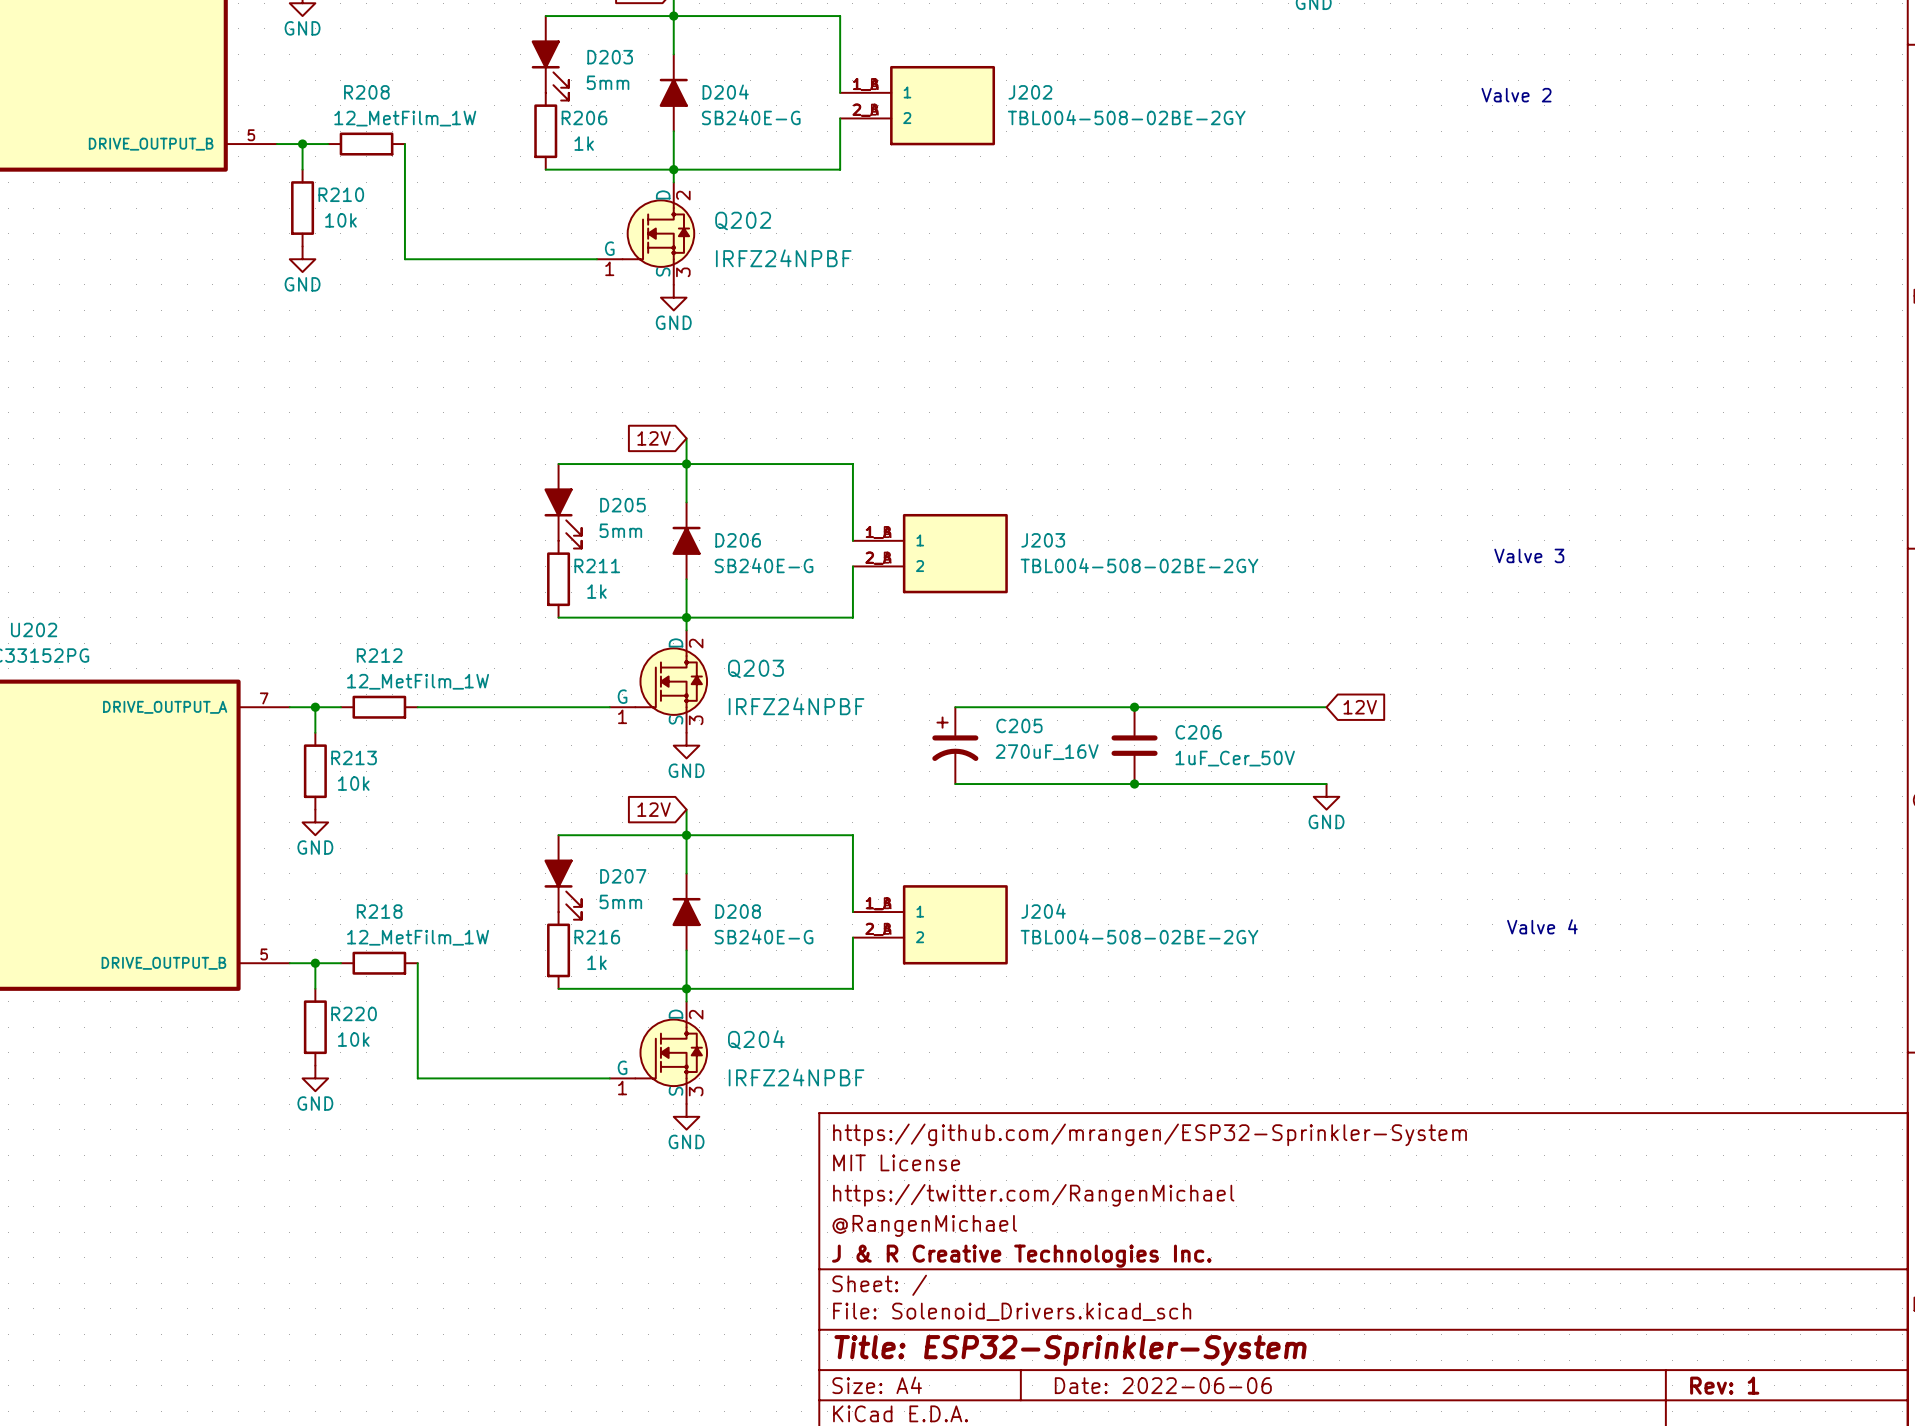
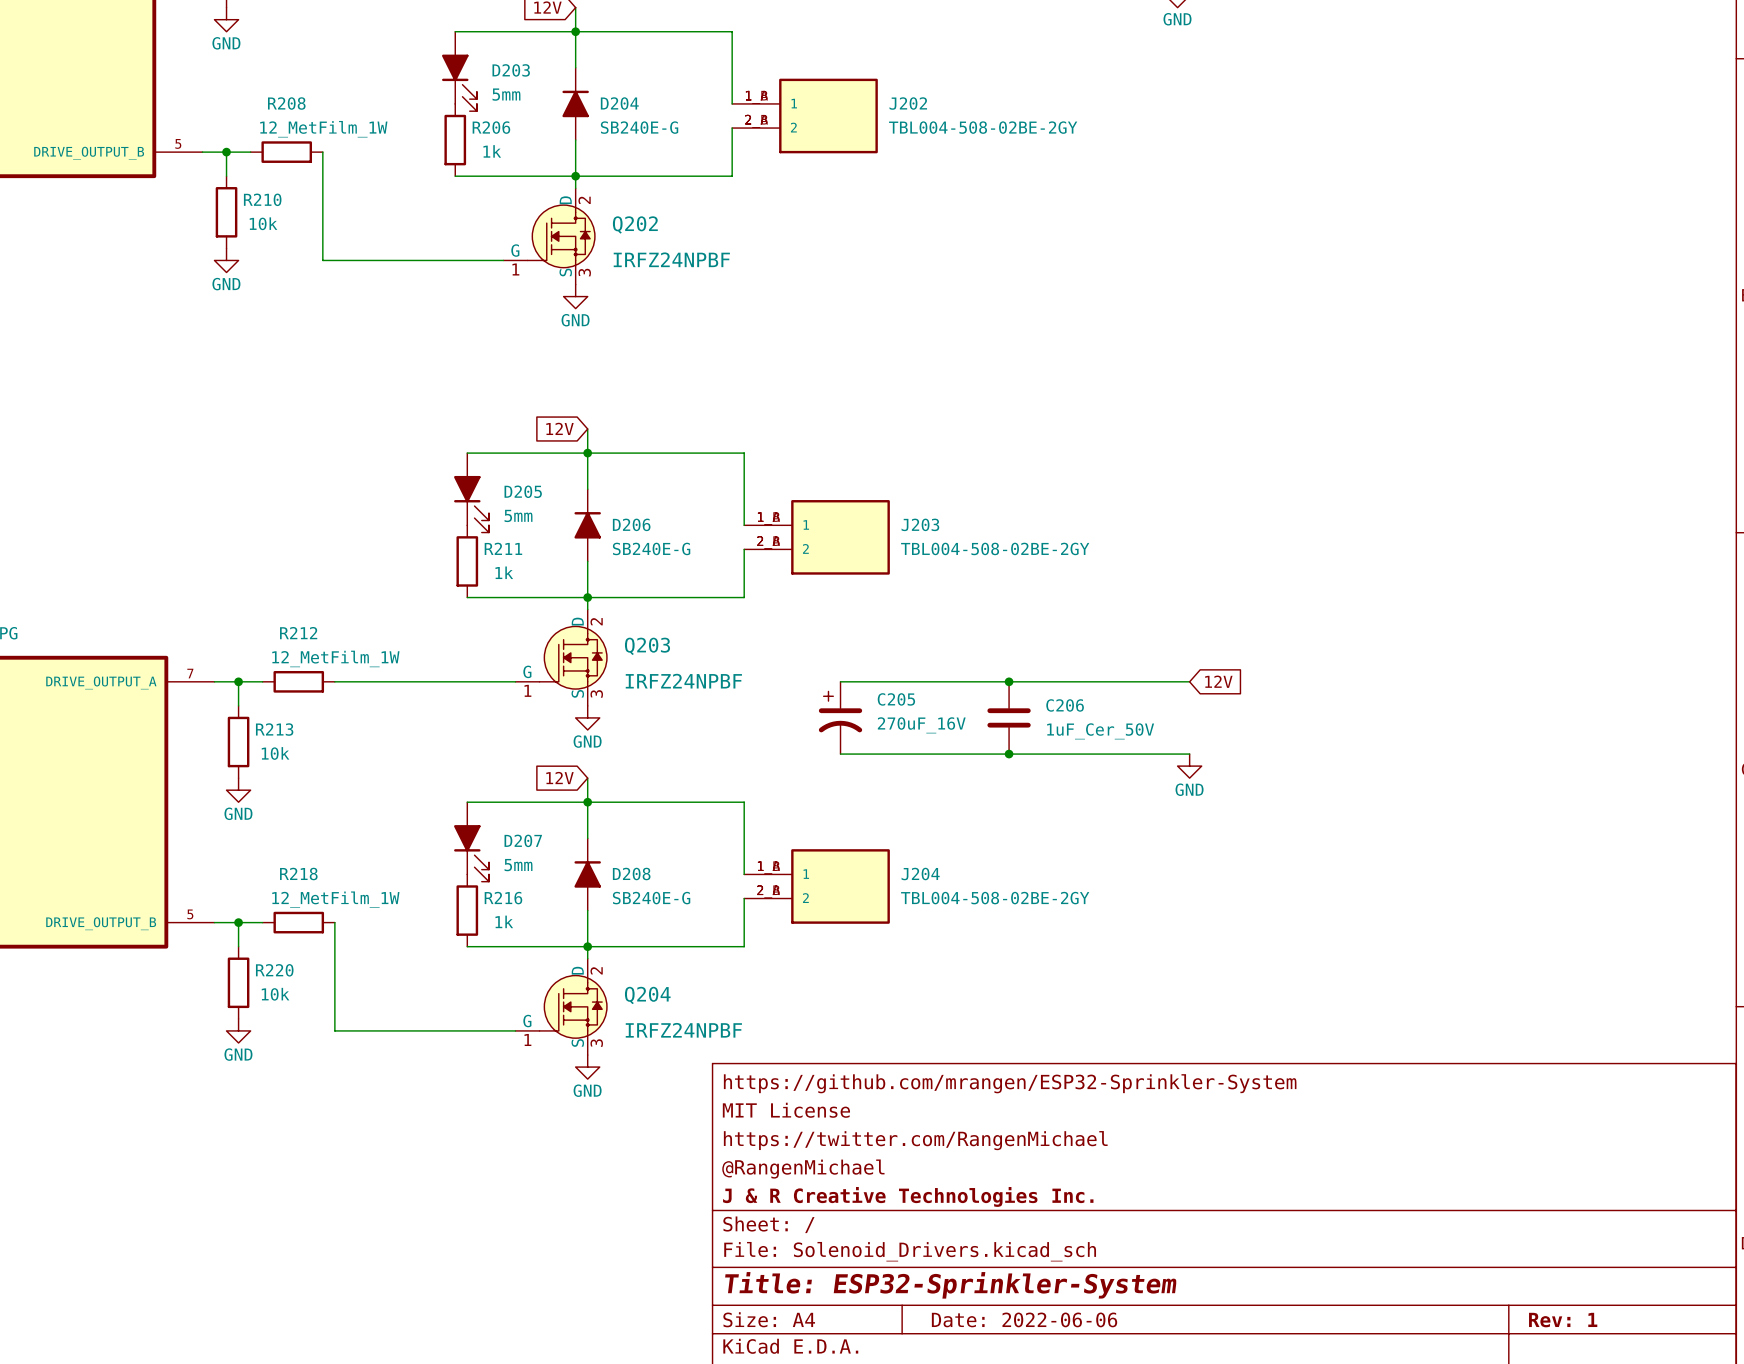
text: Valve 2 (1516, 95) -> none
text: Valve 3 (1529, 555) -> none
text: Valve 4 (1542, 926) -> none

